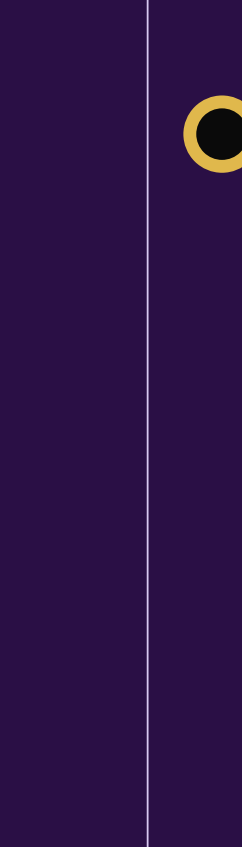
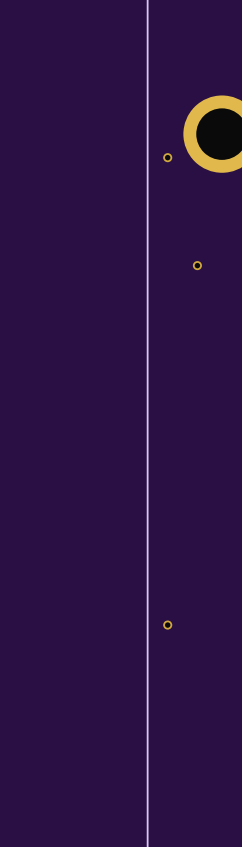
via: none -> (167, 157)
via: none -> (197, 265)
via: none -> (167, 625)

